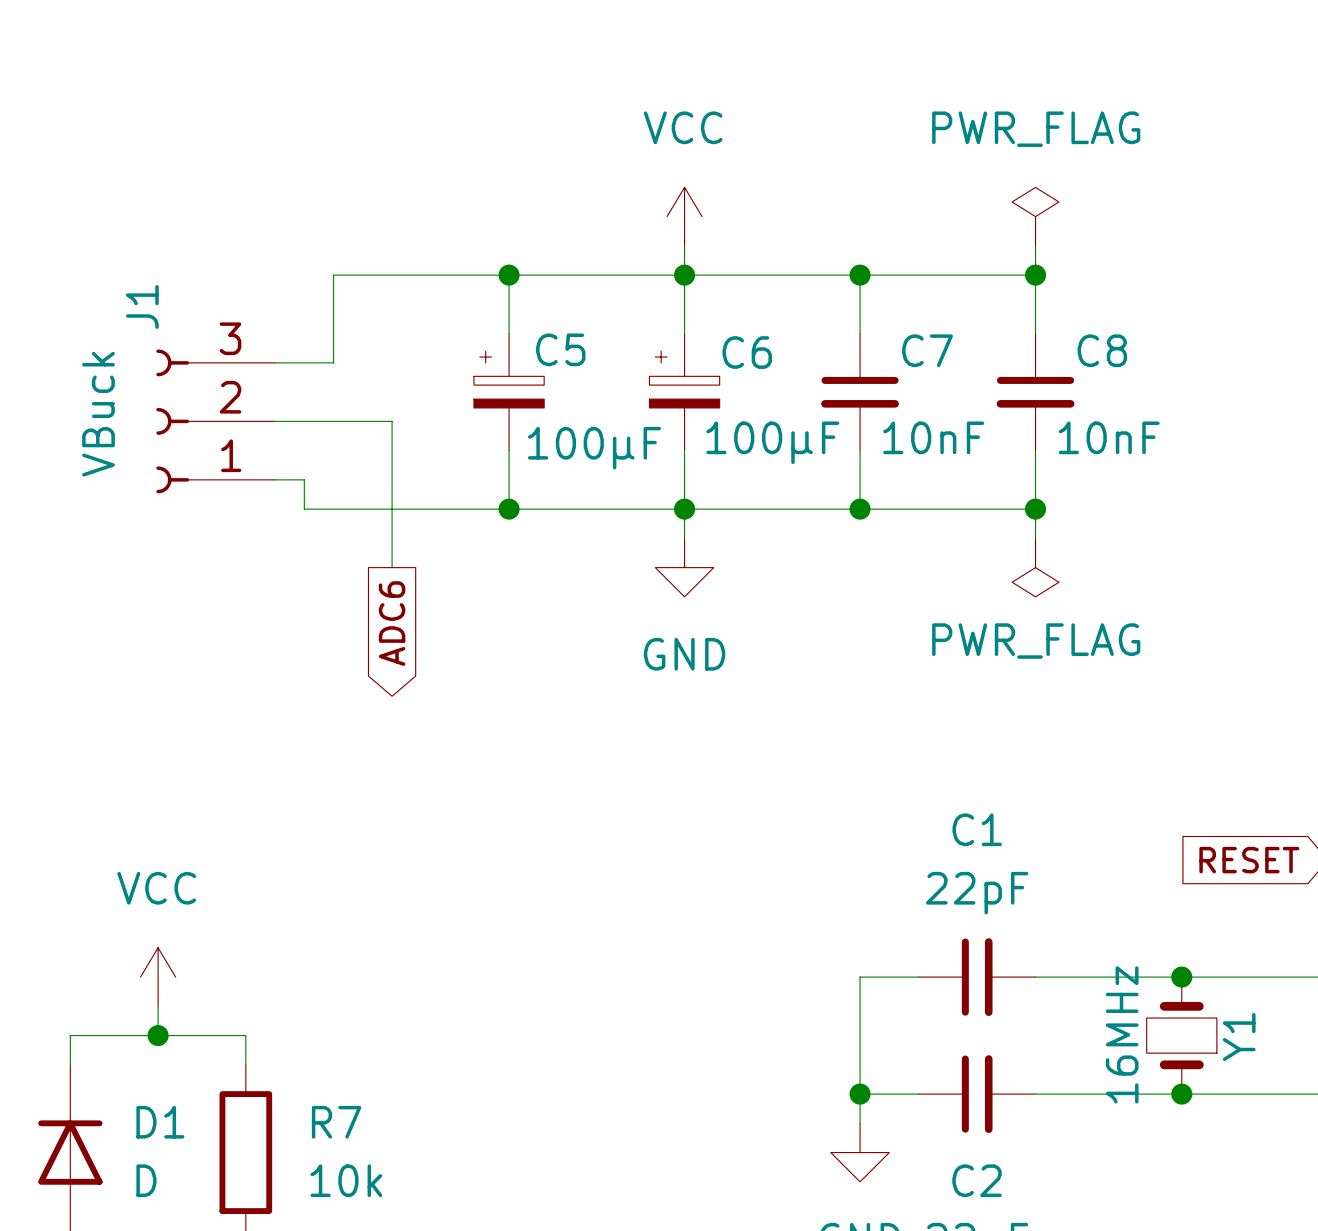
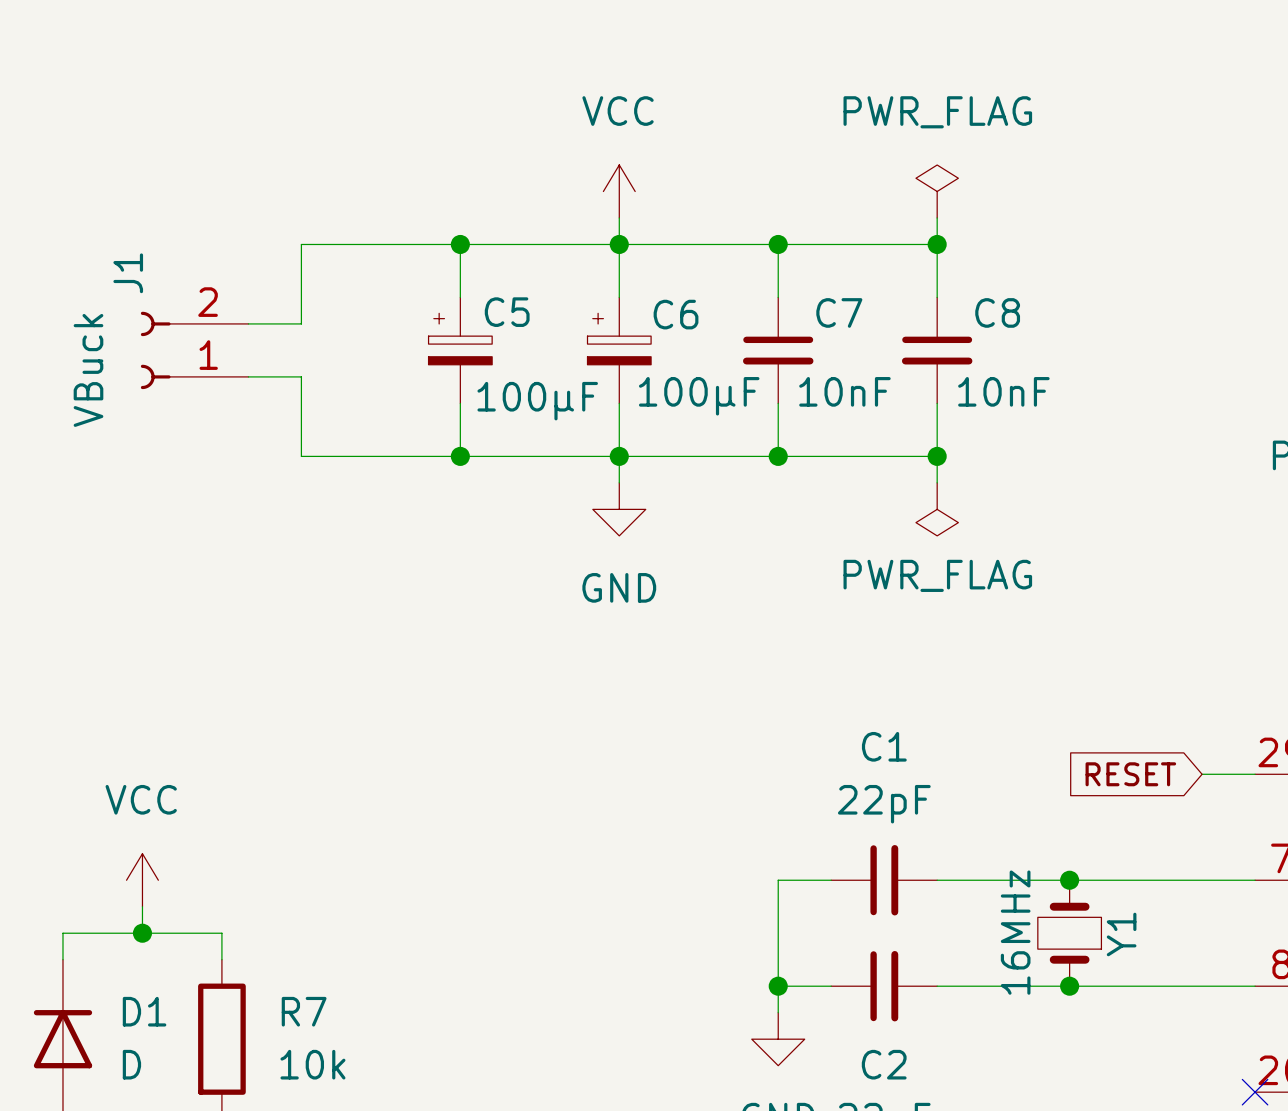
J1 symbol: [156, 349, 276, 494] -> [140, 311, 249, 390]
wire: (333, 421) (392, 421) (392, 567) -> (301, 376) (301, 456)
wire: (275, 479) (304, 479) (304, 509) (333, 509) -> none
global label: ADC6 (392, 623) -> none

